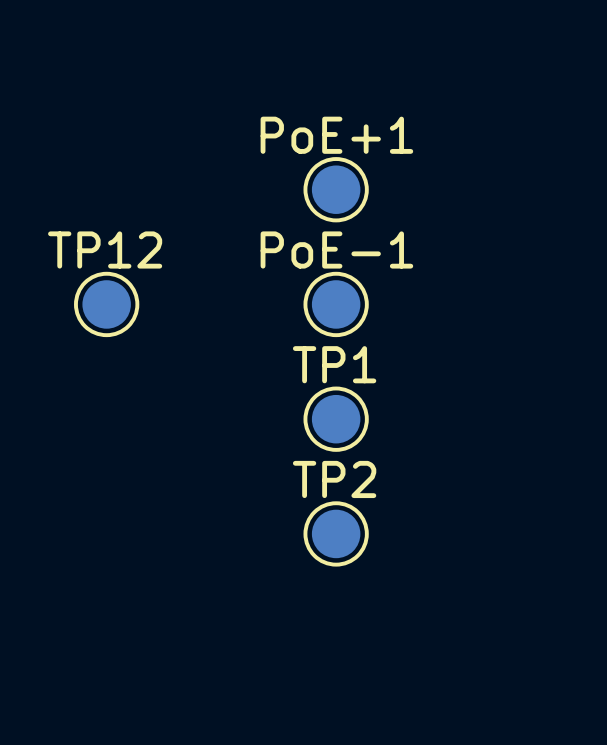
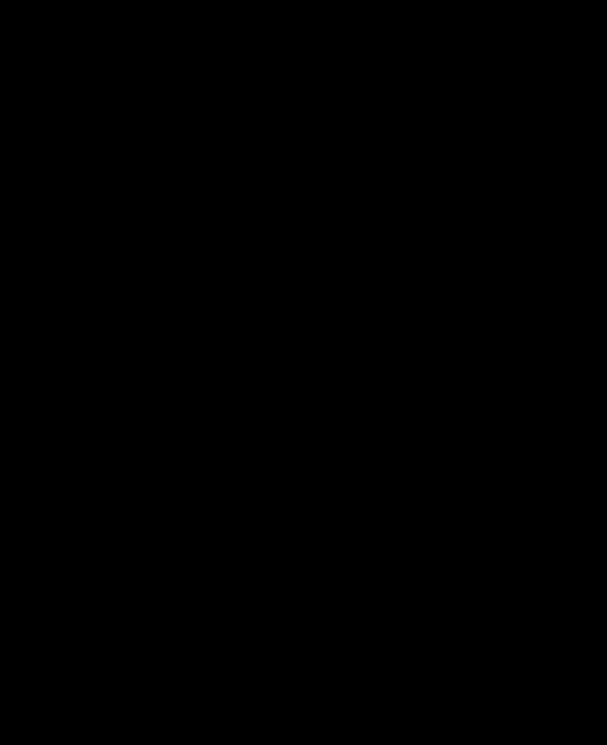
PoE+1: (336, 189) -> none
TP12: (106, 304) -> none
PoE-1: (336, 304) -> none
TP1: (336, 419) -> none
TP2: (336, 533) -> none

